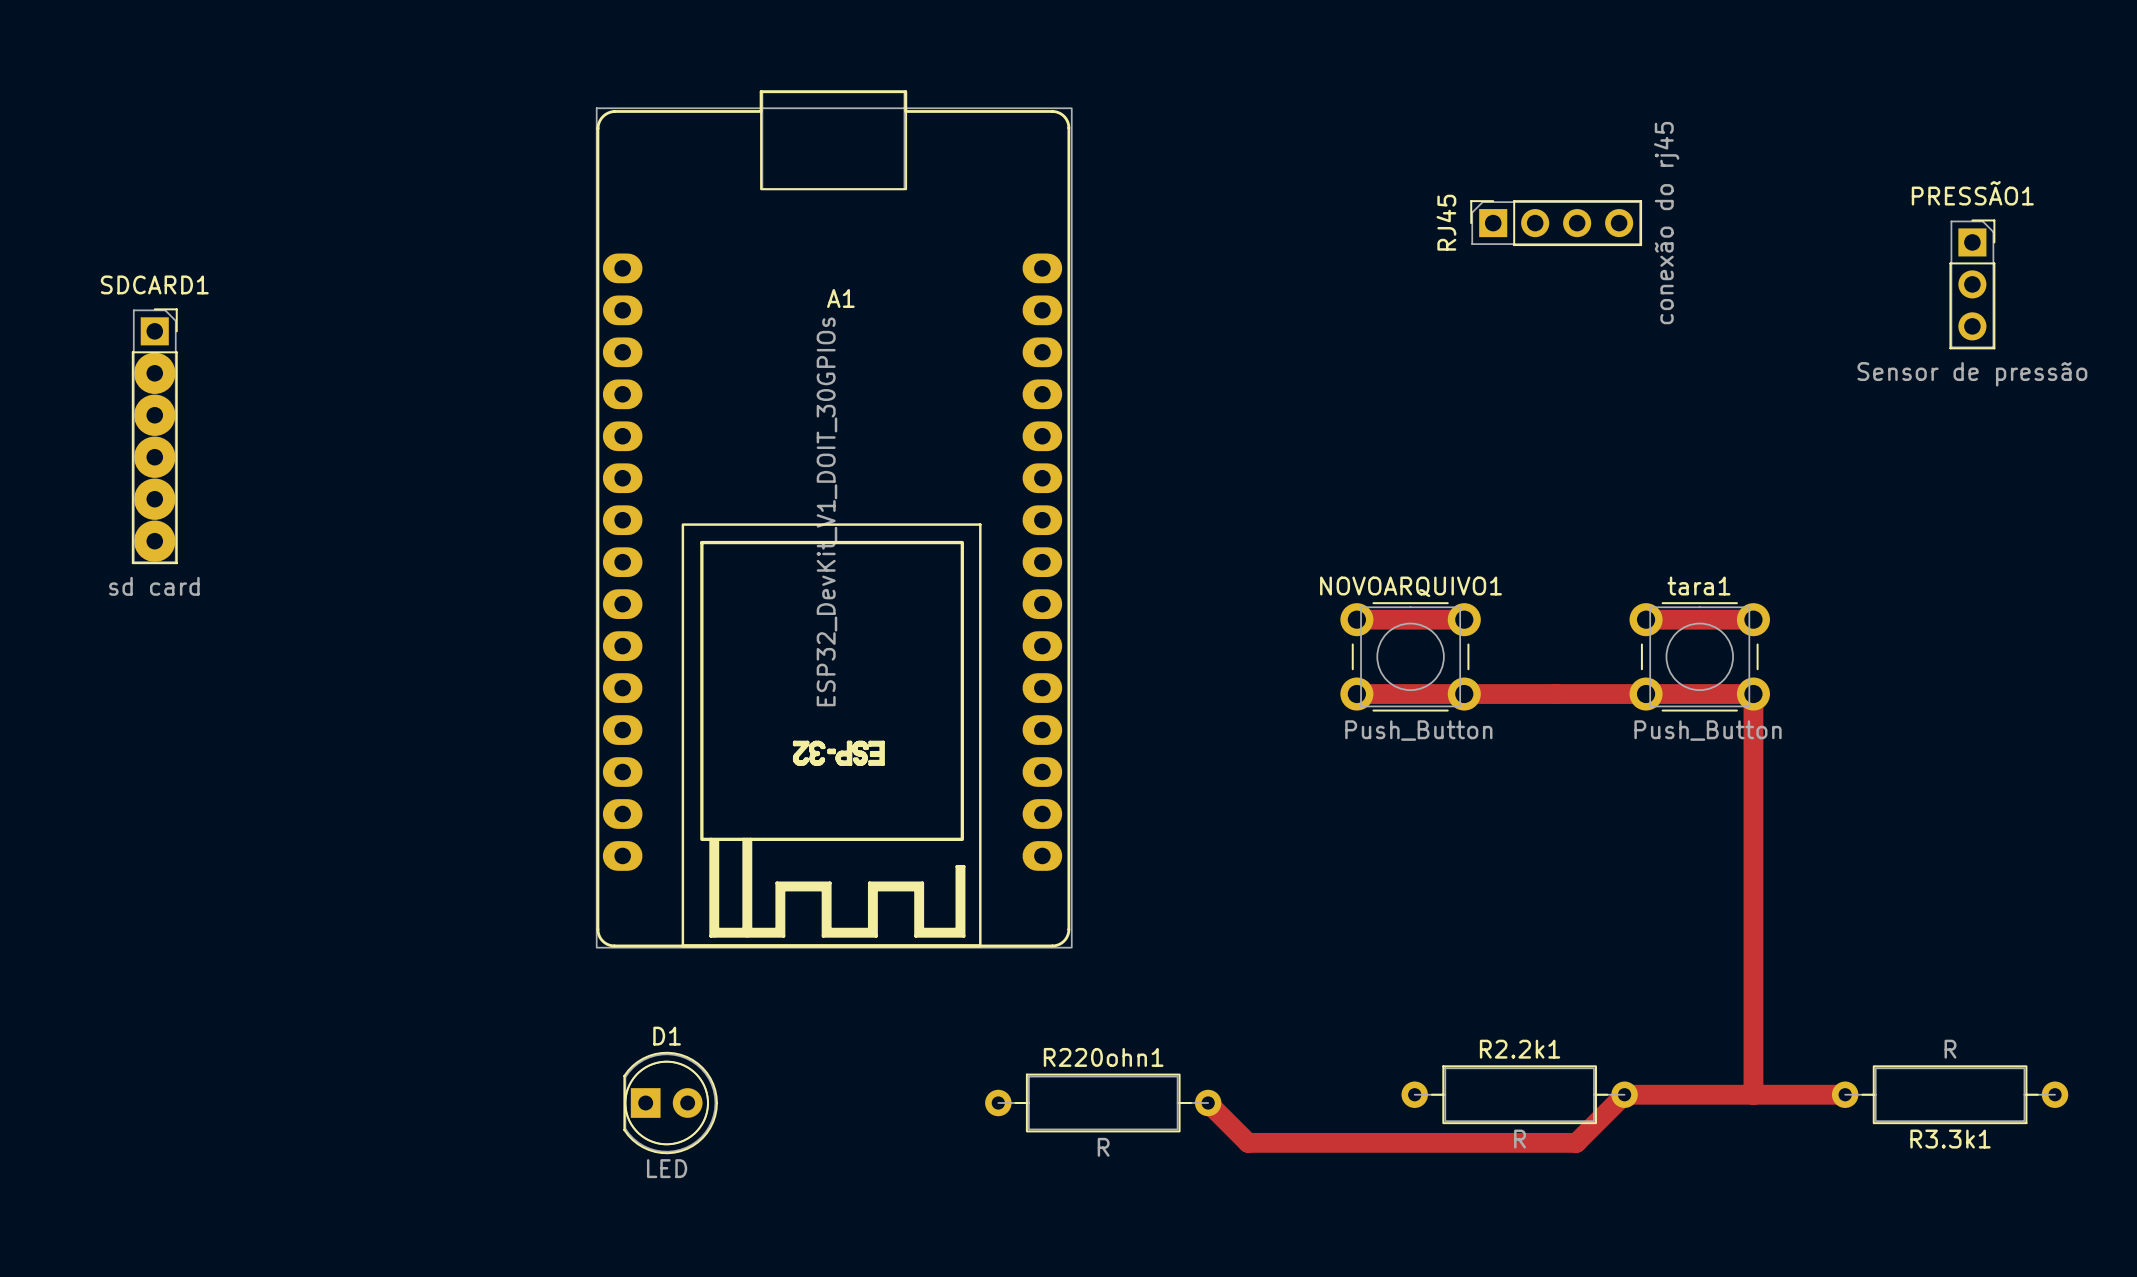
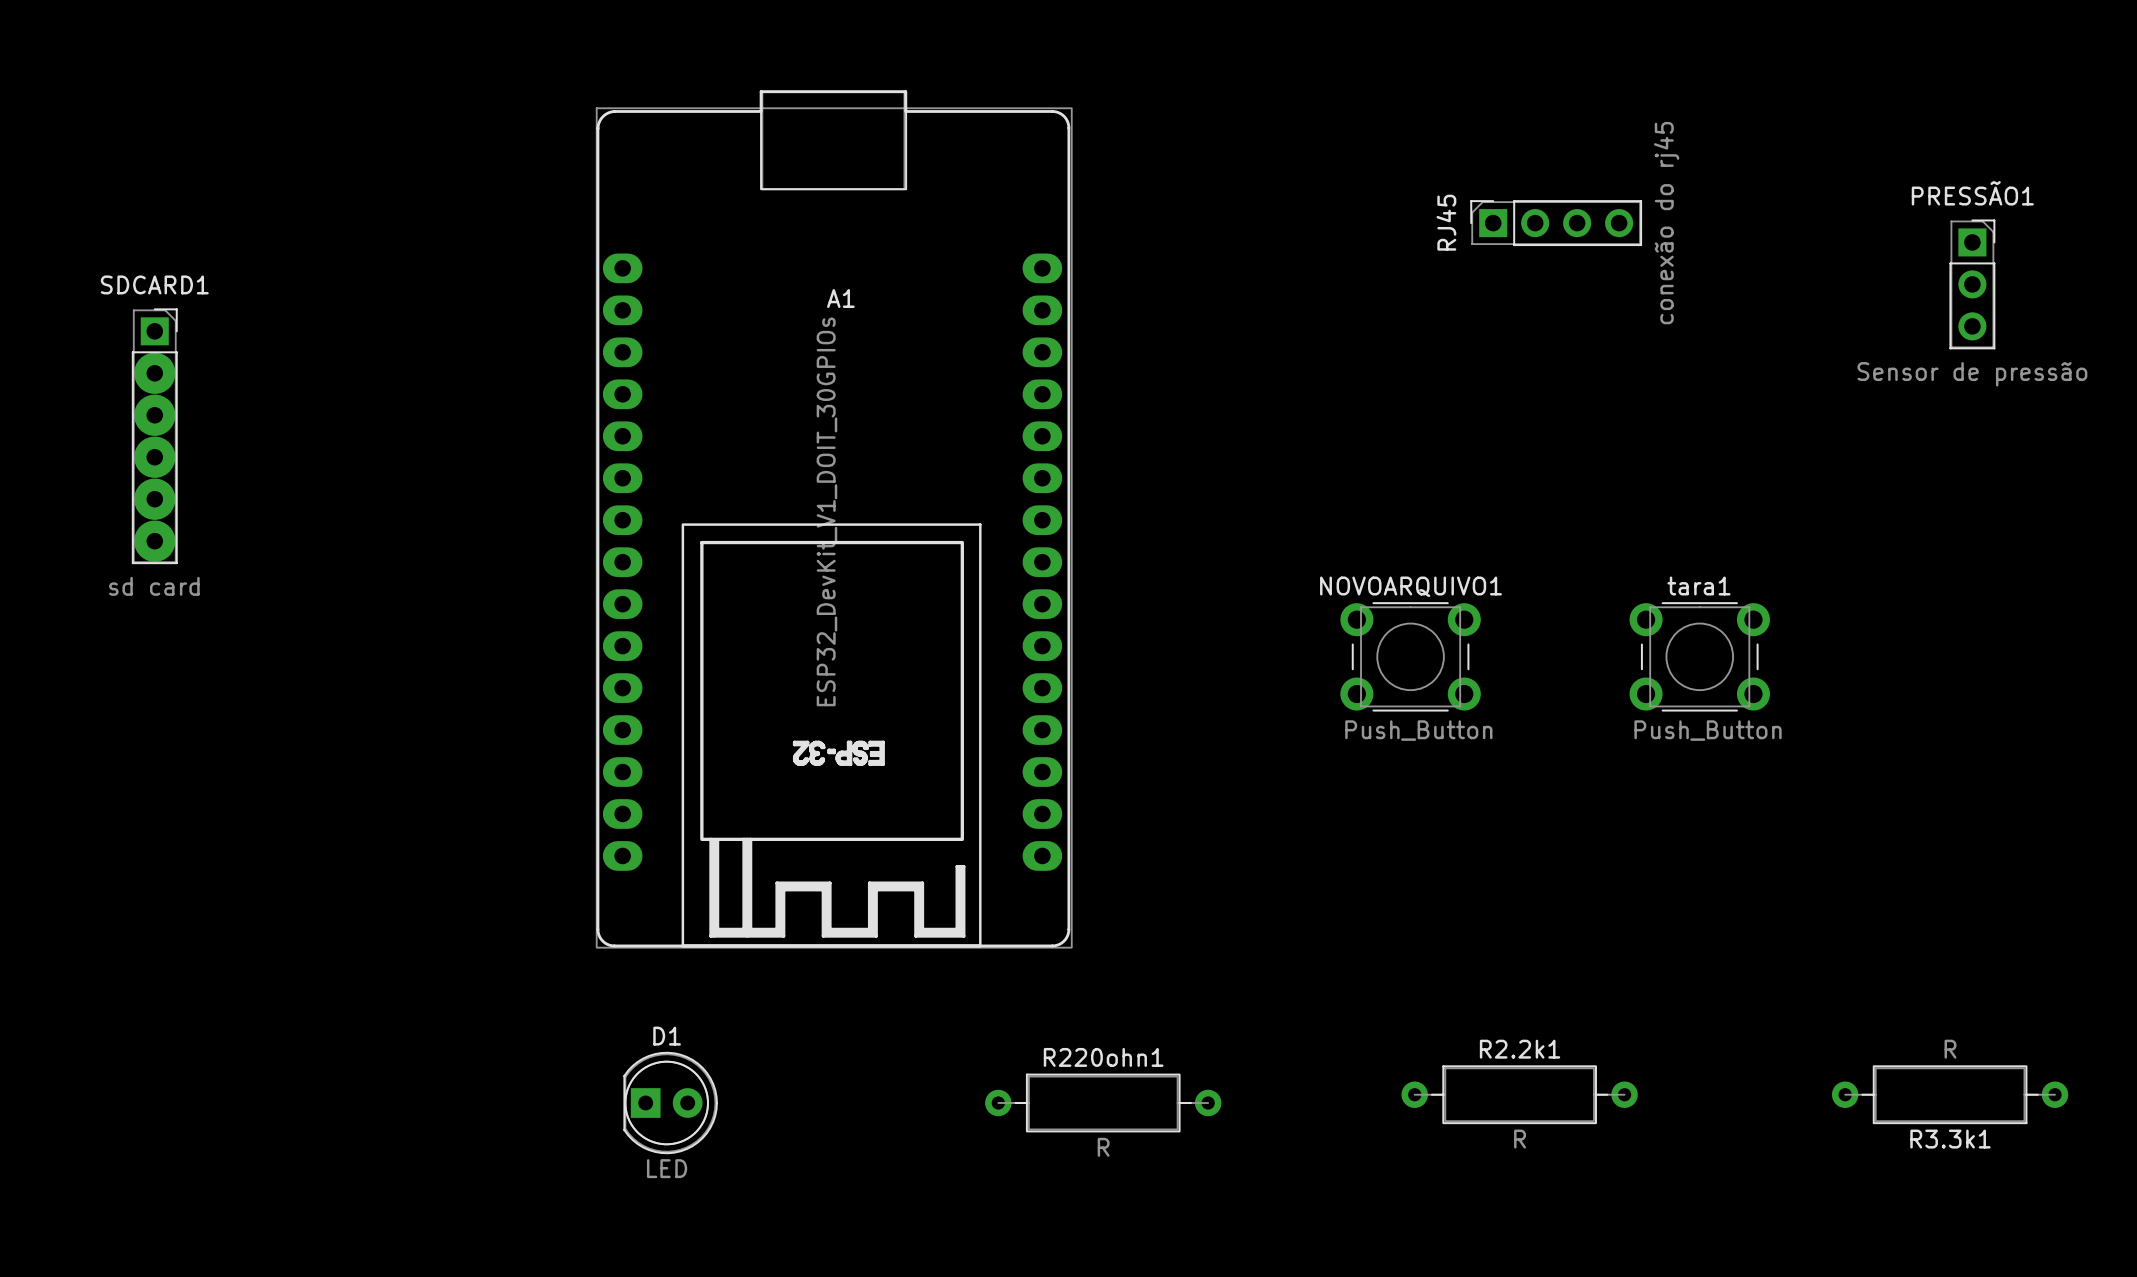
track: (1356, 619) (1464, 619) -> none
track: (1646, 619) (1753, 619) -> none
track: (1356, 694) (1753, 694) (1753, 1094) -> none
track: (1845, 1094) (1624, 1094) (1576, 1142) (1248, 1142) (1208, 1102) -> none

